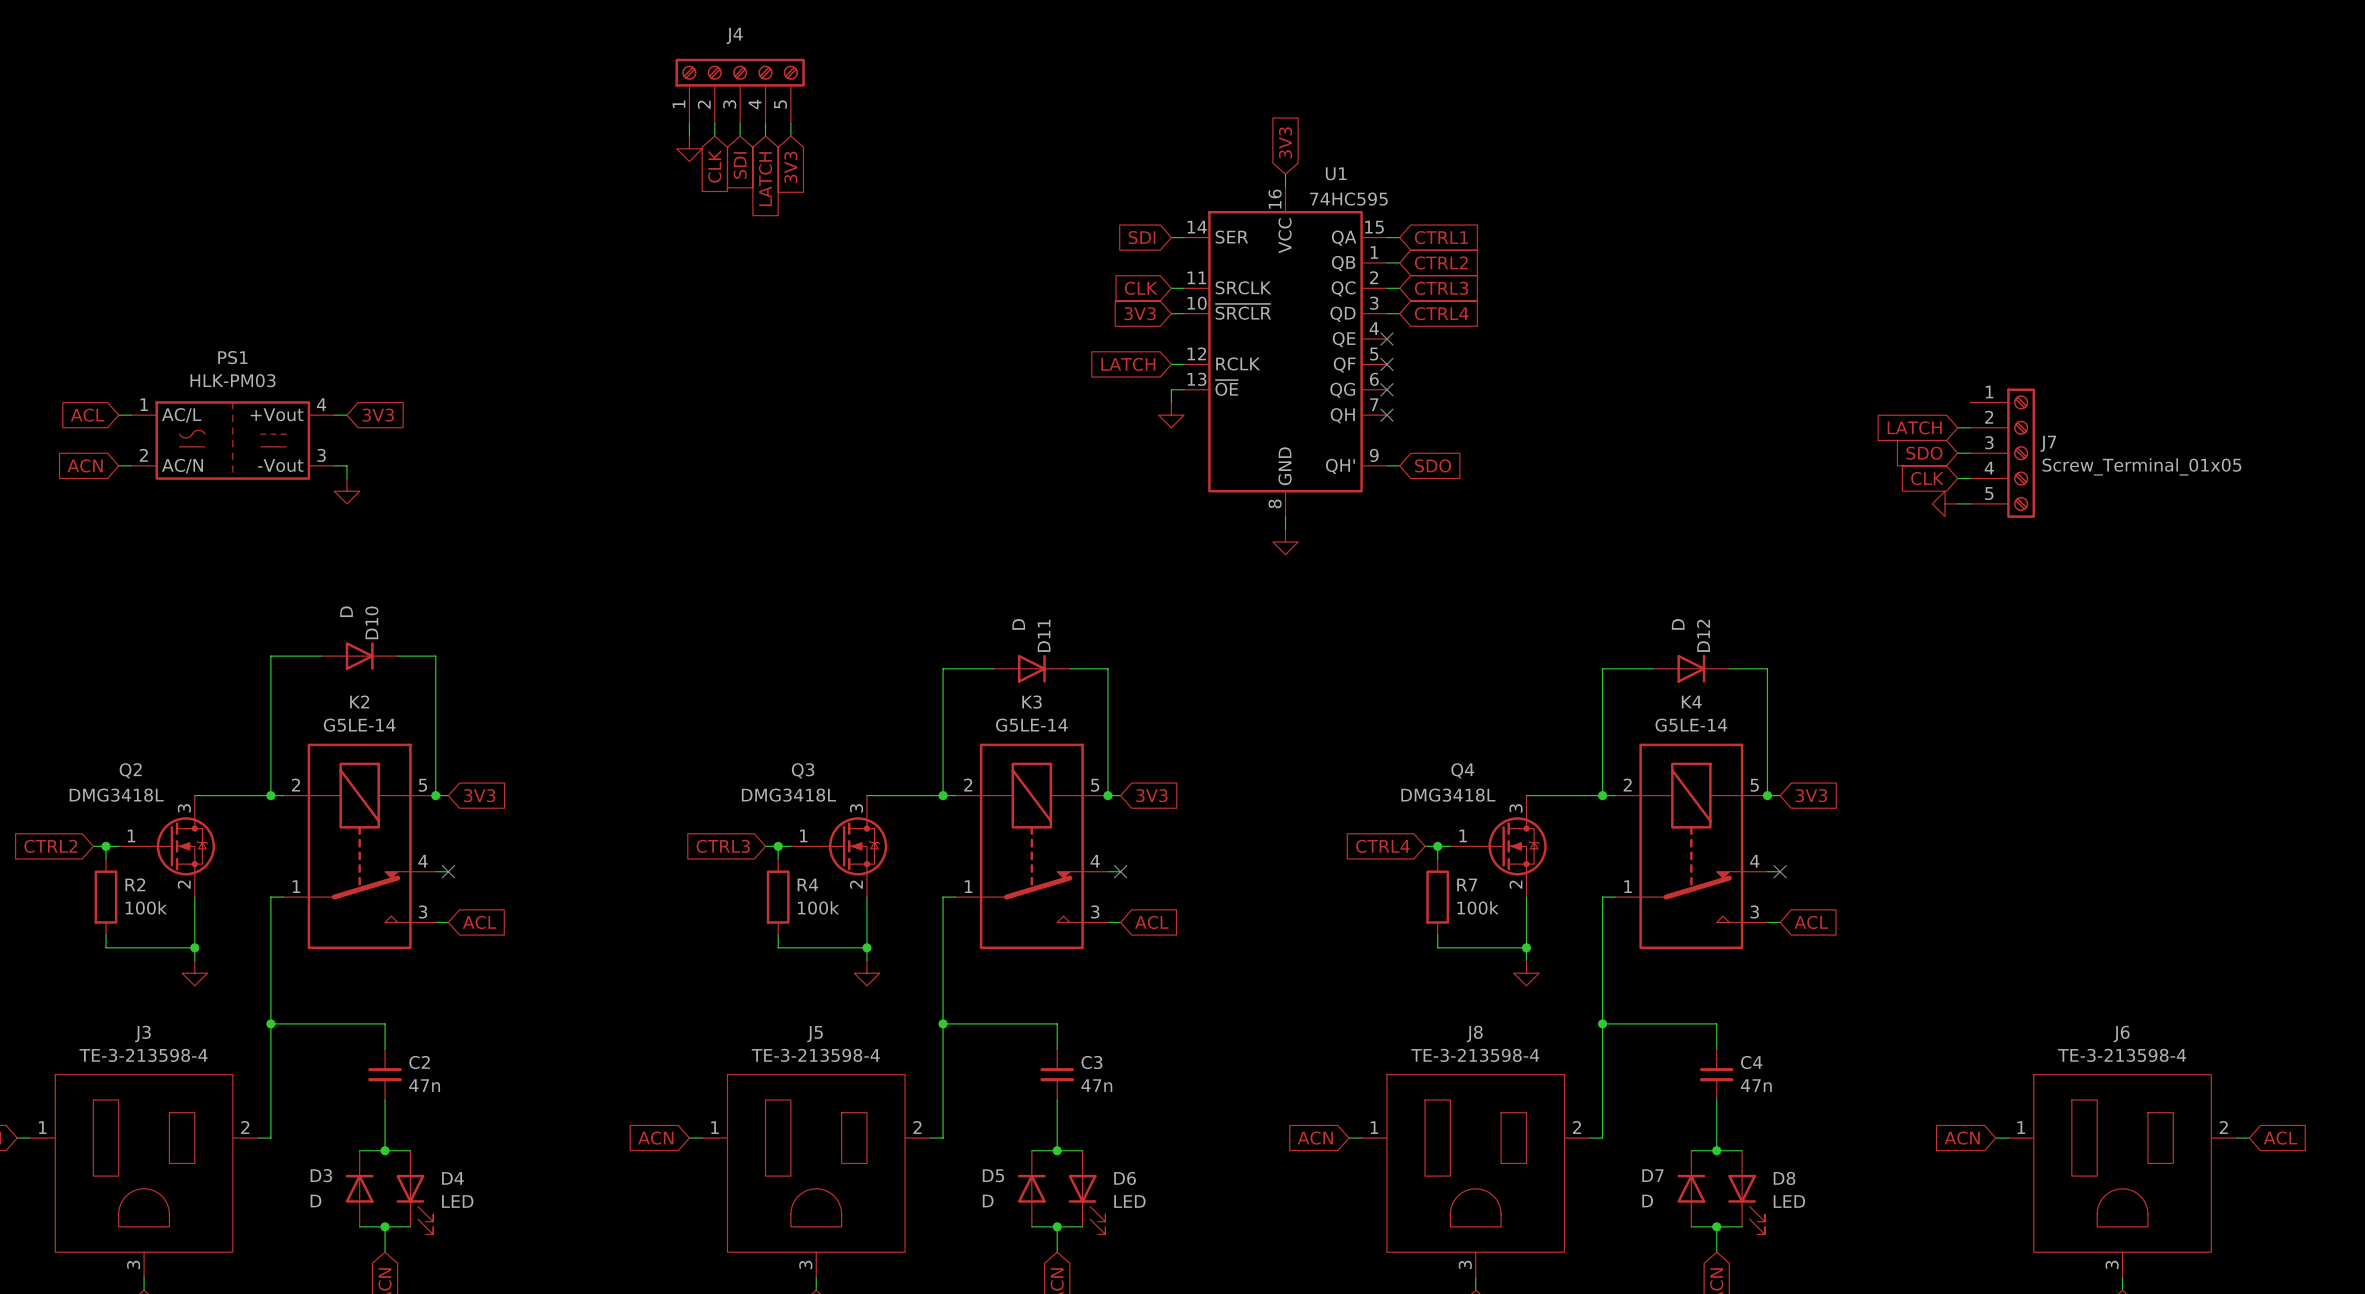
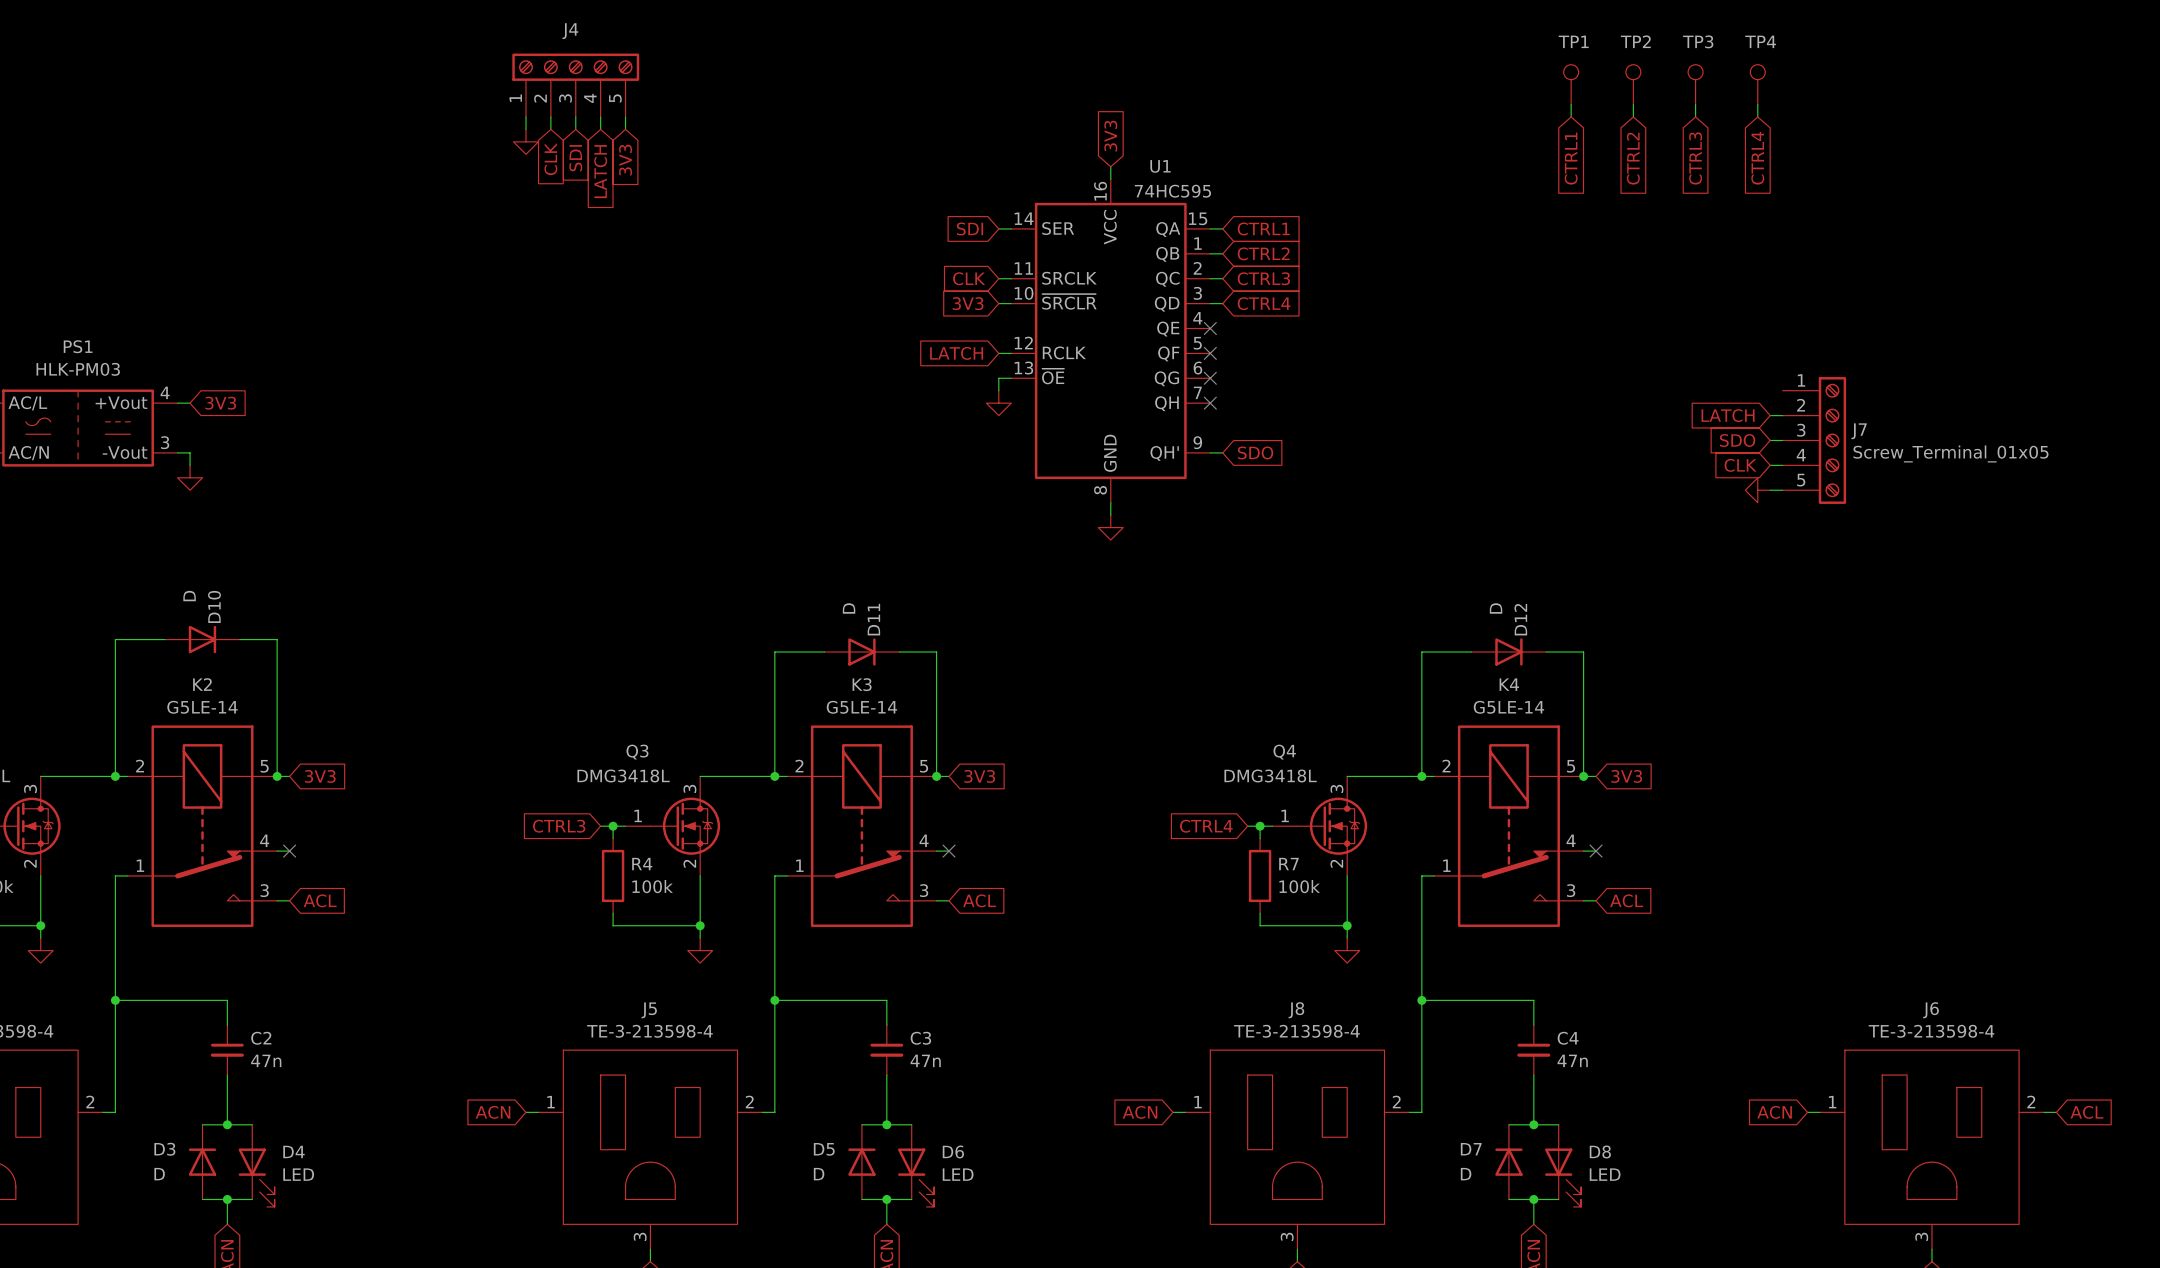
TP1: none -> (1571, 84)
TP2: none -> (1633, 84)
TP3: none -> (1695, 84)
TP4: none -> (1757, 84)
wire: none -> (1571, 104) (1571, 116)
wire: none -> (1633, 104) (1633, 116)
wire: none -> (1695, 104) (1695, 116)
wire: none -> (1757, 104) (1757, 116)
global label: none -> CTRL1 (1571, 158)
global label: none -> CTRL2 (1633, 158)
global label: none -> CTRL3 (1695, 158)
global label: none -> CTRL4 (1757, 158)

